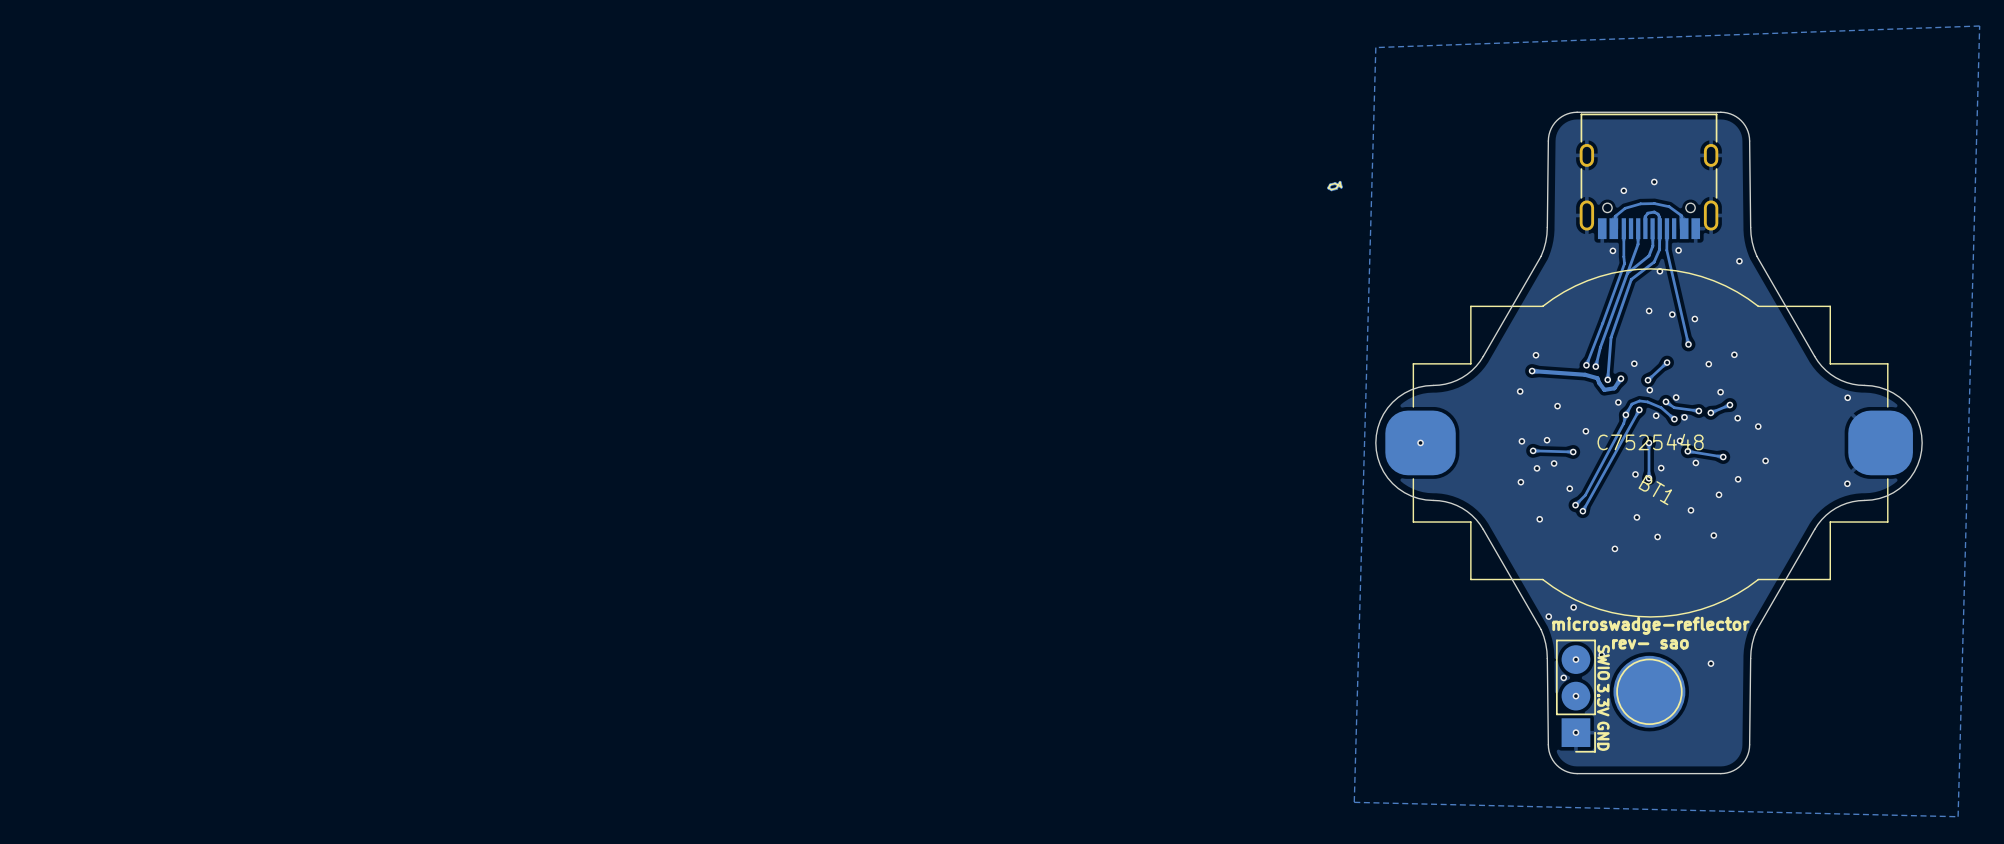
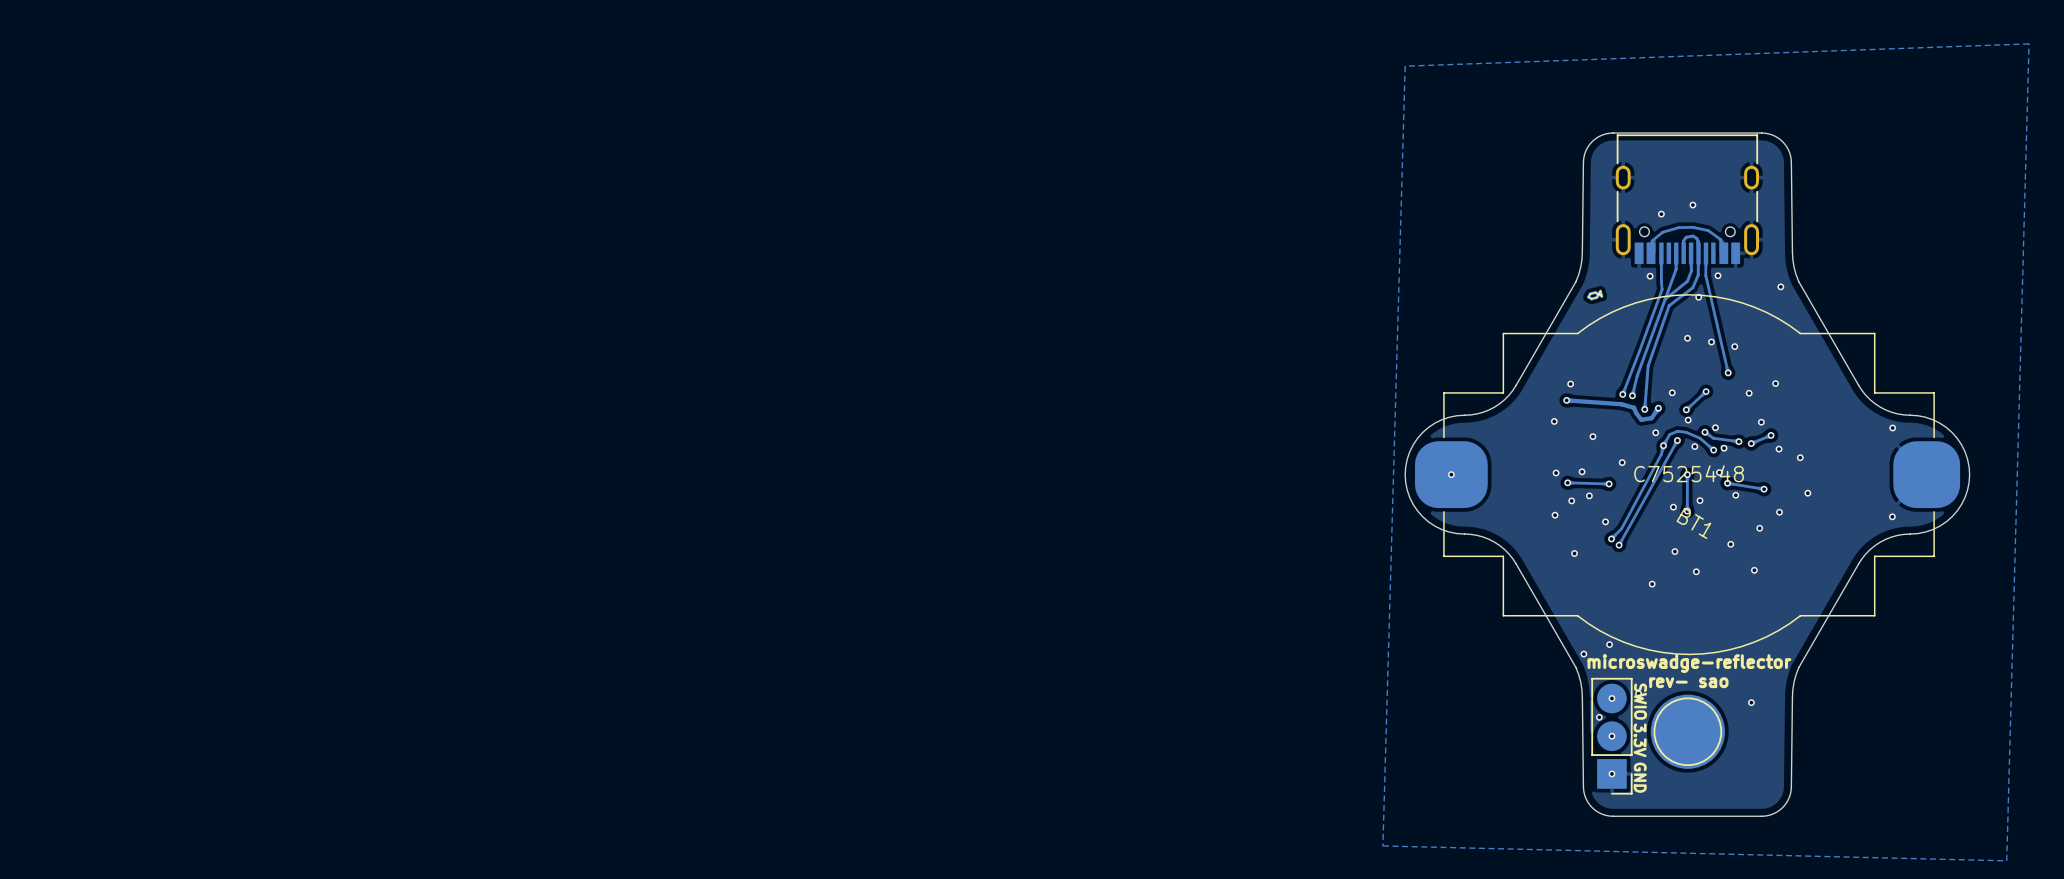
line: (1340, 182) (1341, 187) (1335, 183) (1330, 184) (1328, 187) (1331, 189) (1336, 188) (1340, 182) -> (1600, 291) (1601, 296) (1595, 292) (1590, 293) (1588, 297) (1591, 298) (1596, 297) (1600, 291)
track: (1340, 182) (1341, 187) (1335, 183) (1330, 184) (1328, 188) (1331, 189) (1336, 188) (1340, 182) -> (1600, 291) (1601, 296) (1595, 292) (1590, 293) (1588, 297) (1591, 299) (1596, 297) (1600, 291)

